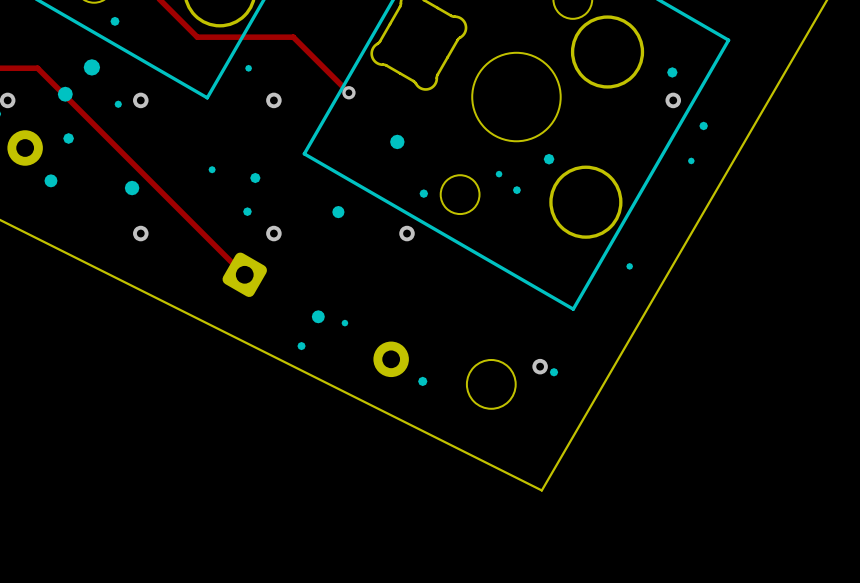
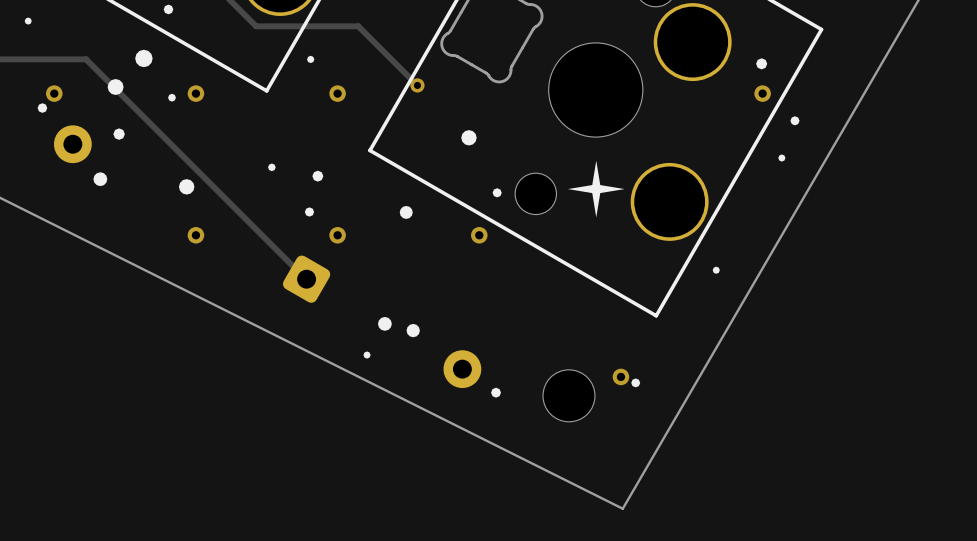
drawing: [543, 153, 555, 165] -> none
drawing: [495, 170, 503, 178] -> none
drawing shape: [512, 186, 521, 195] -> [567, 160, 625, 218]
drawing: none -> [406, 323, 420, 338]
drawing position: (344, 323) -> (367, 355)
drawing: [297, 341, 306, 351] -> none

